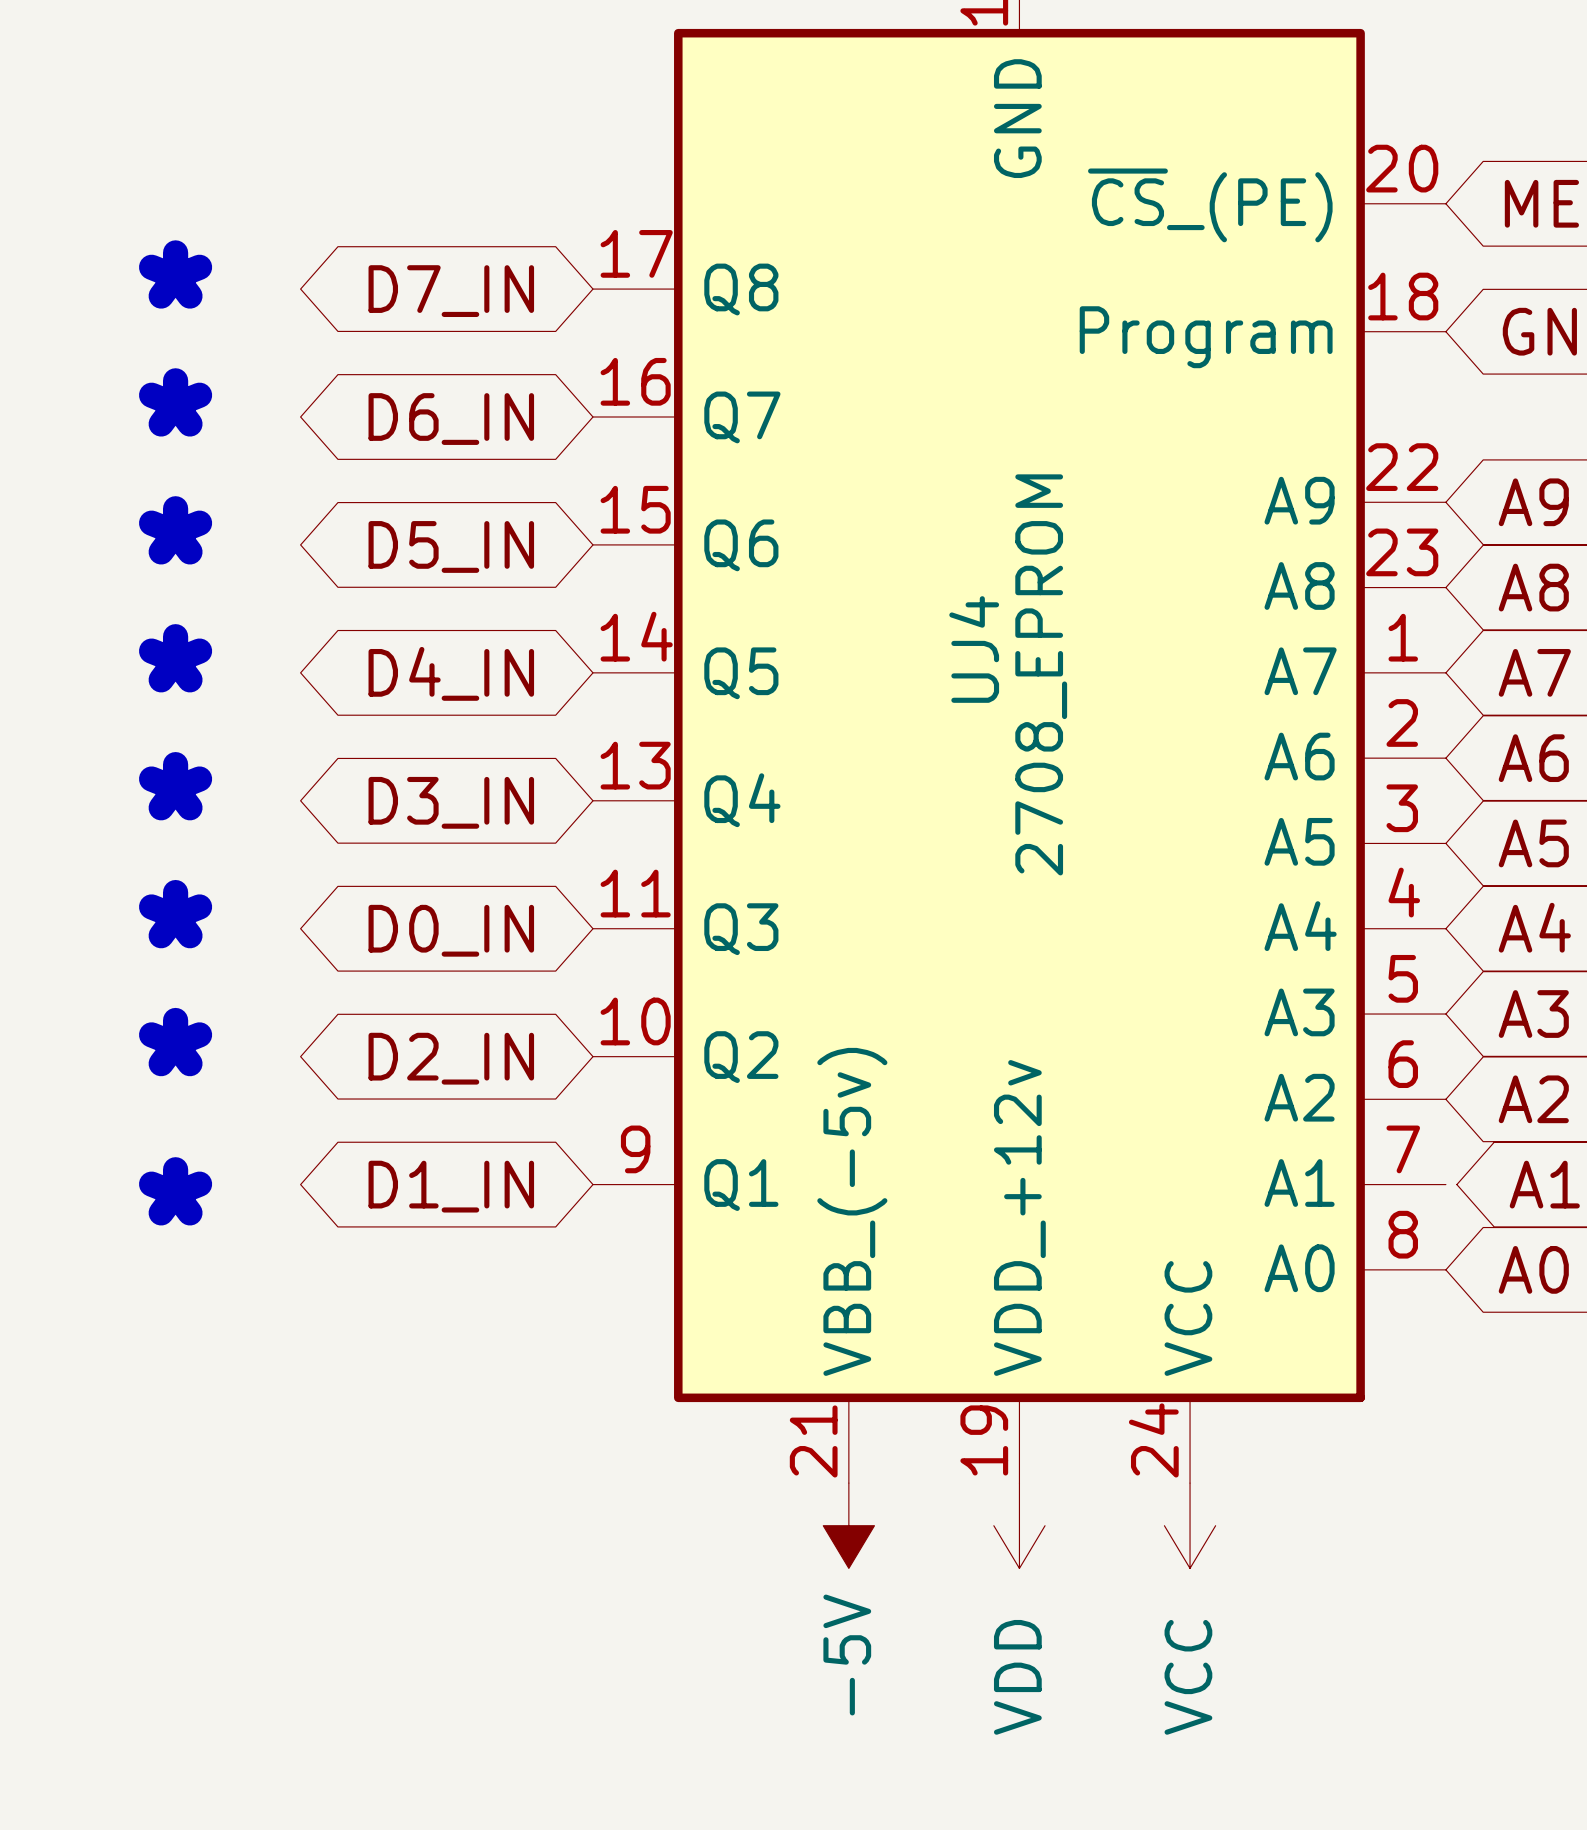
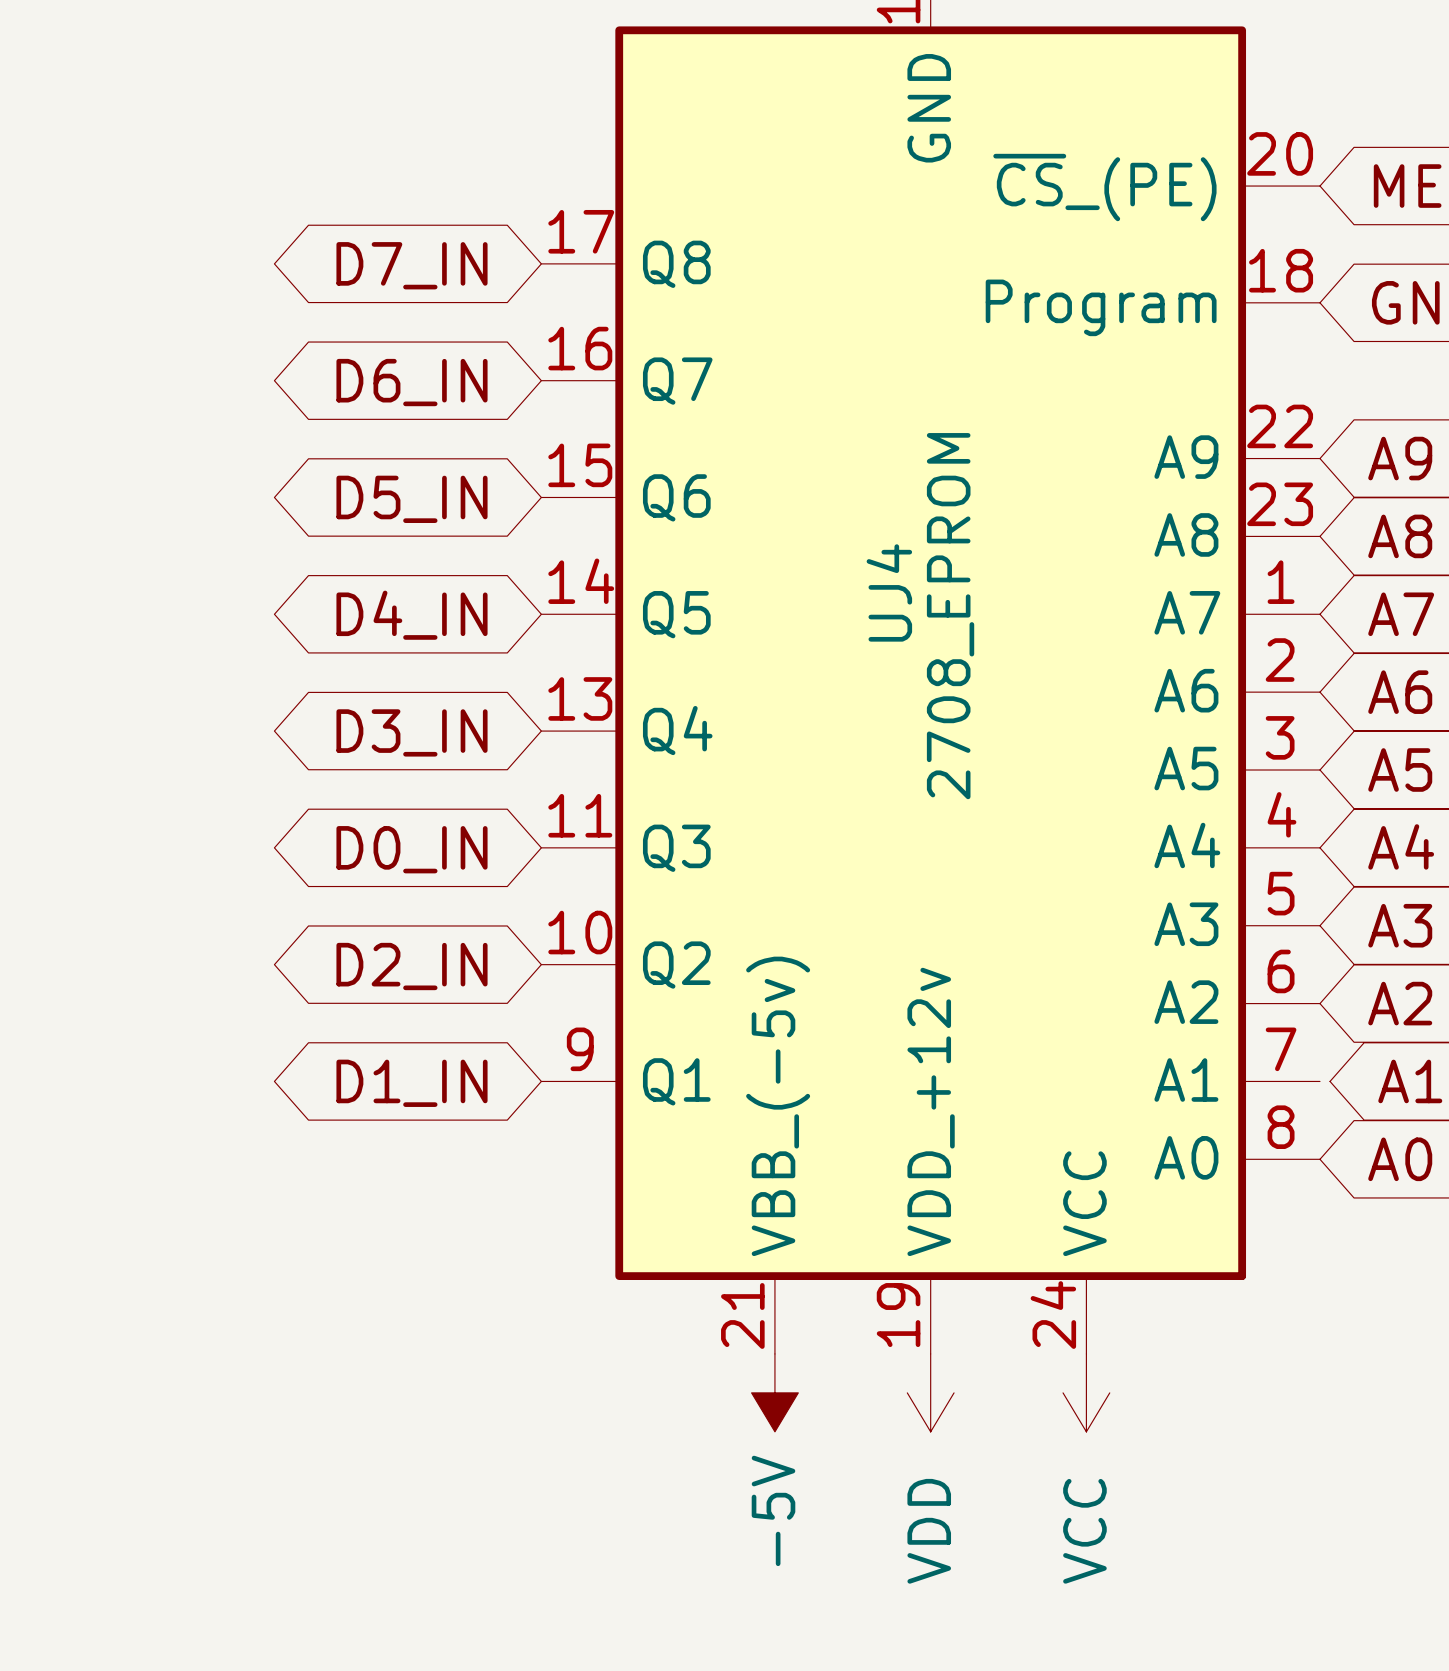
text: * (175, 274) -> none
text: * (175, 402) -> none
text: * (175, 530) -> none
text: * (175, 658) -> none
text: * (175, 786) -> none
text: * (175, 914) -> none
text: * (175, 1042) -> none
text: * (175, 1191) -> none

